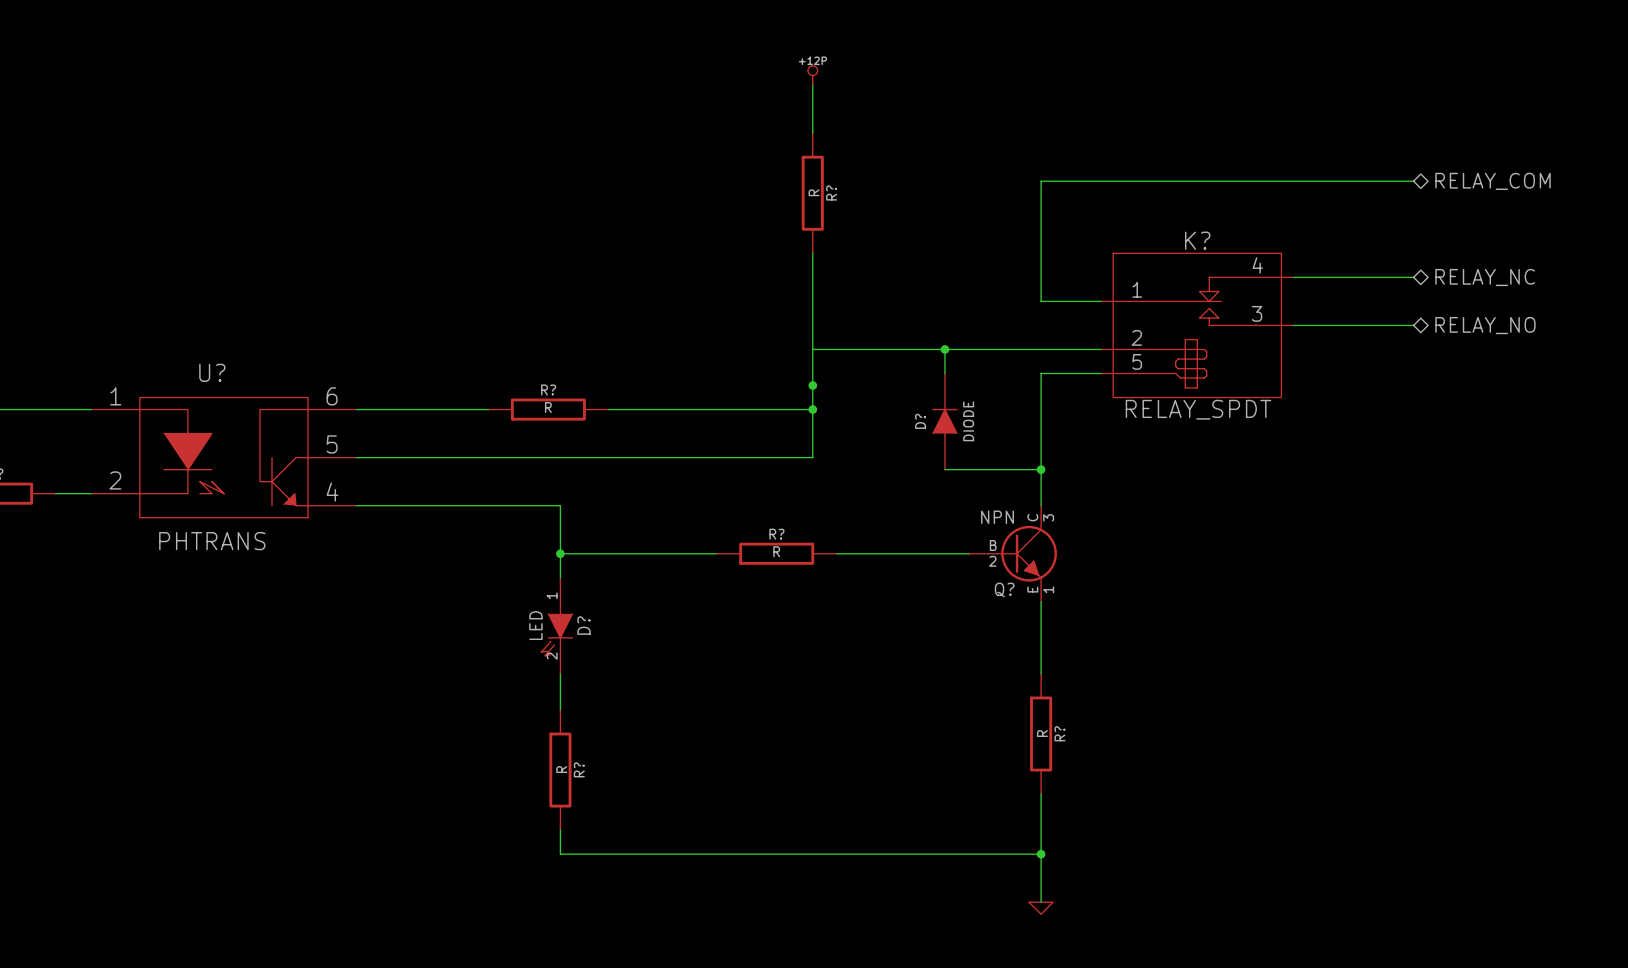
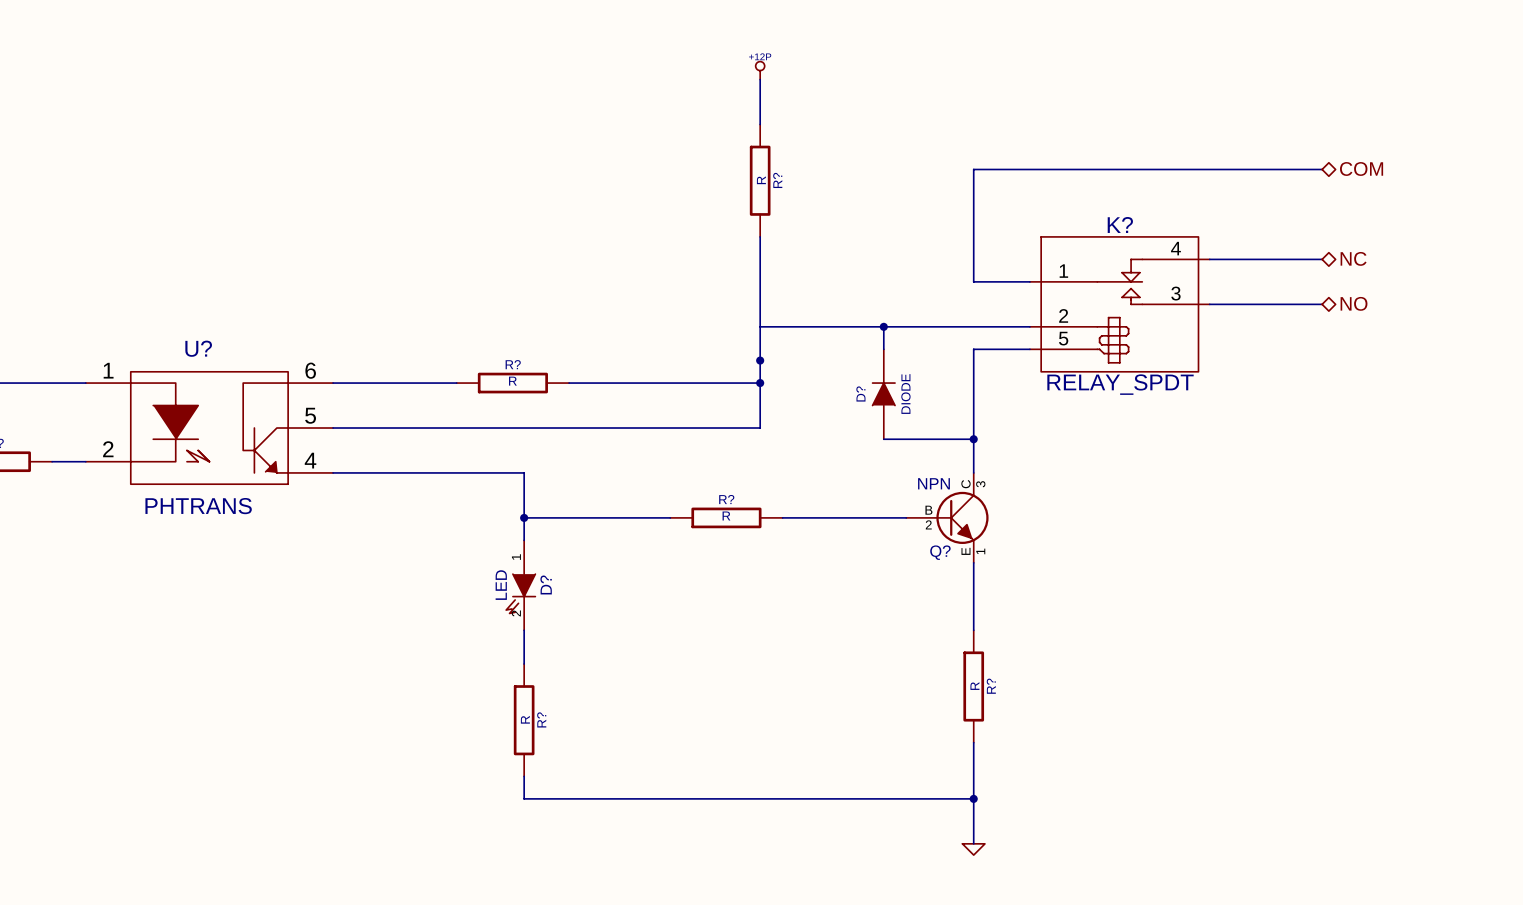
hierarchical label: RELAY_COM (1493, 181) -> COM (1361, 168)
hierarchical label: RELAY_NC (1485, 277) -> NC (1353, 258)
hierarchical label: RELAY_NO (1485, 325) -> NO (1354, 303)

